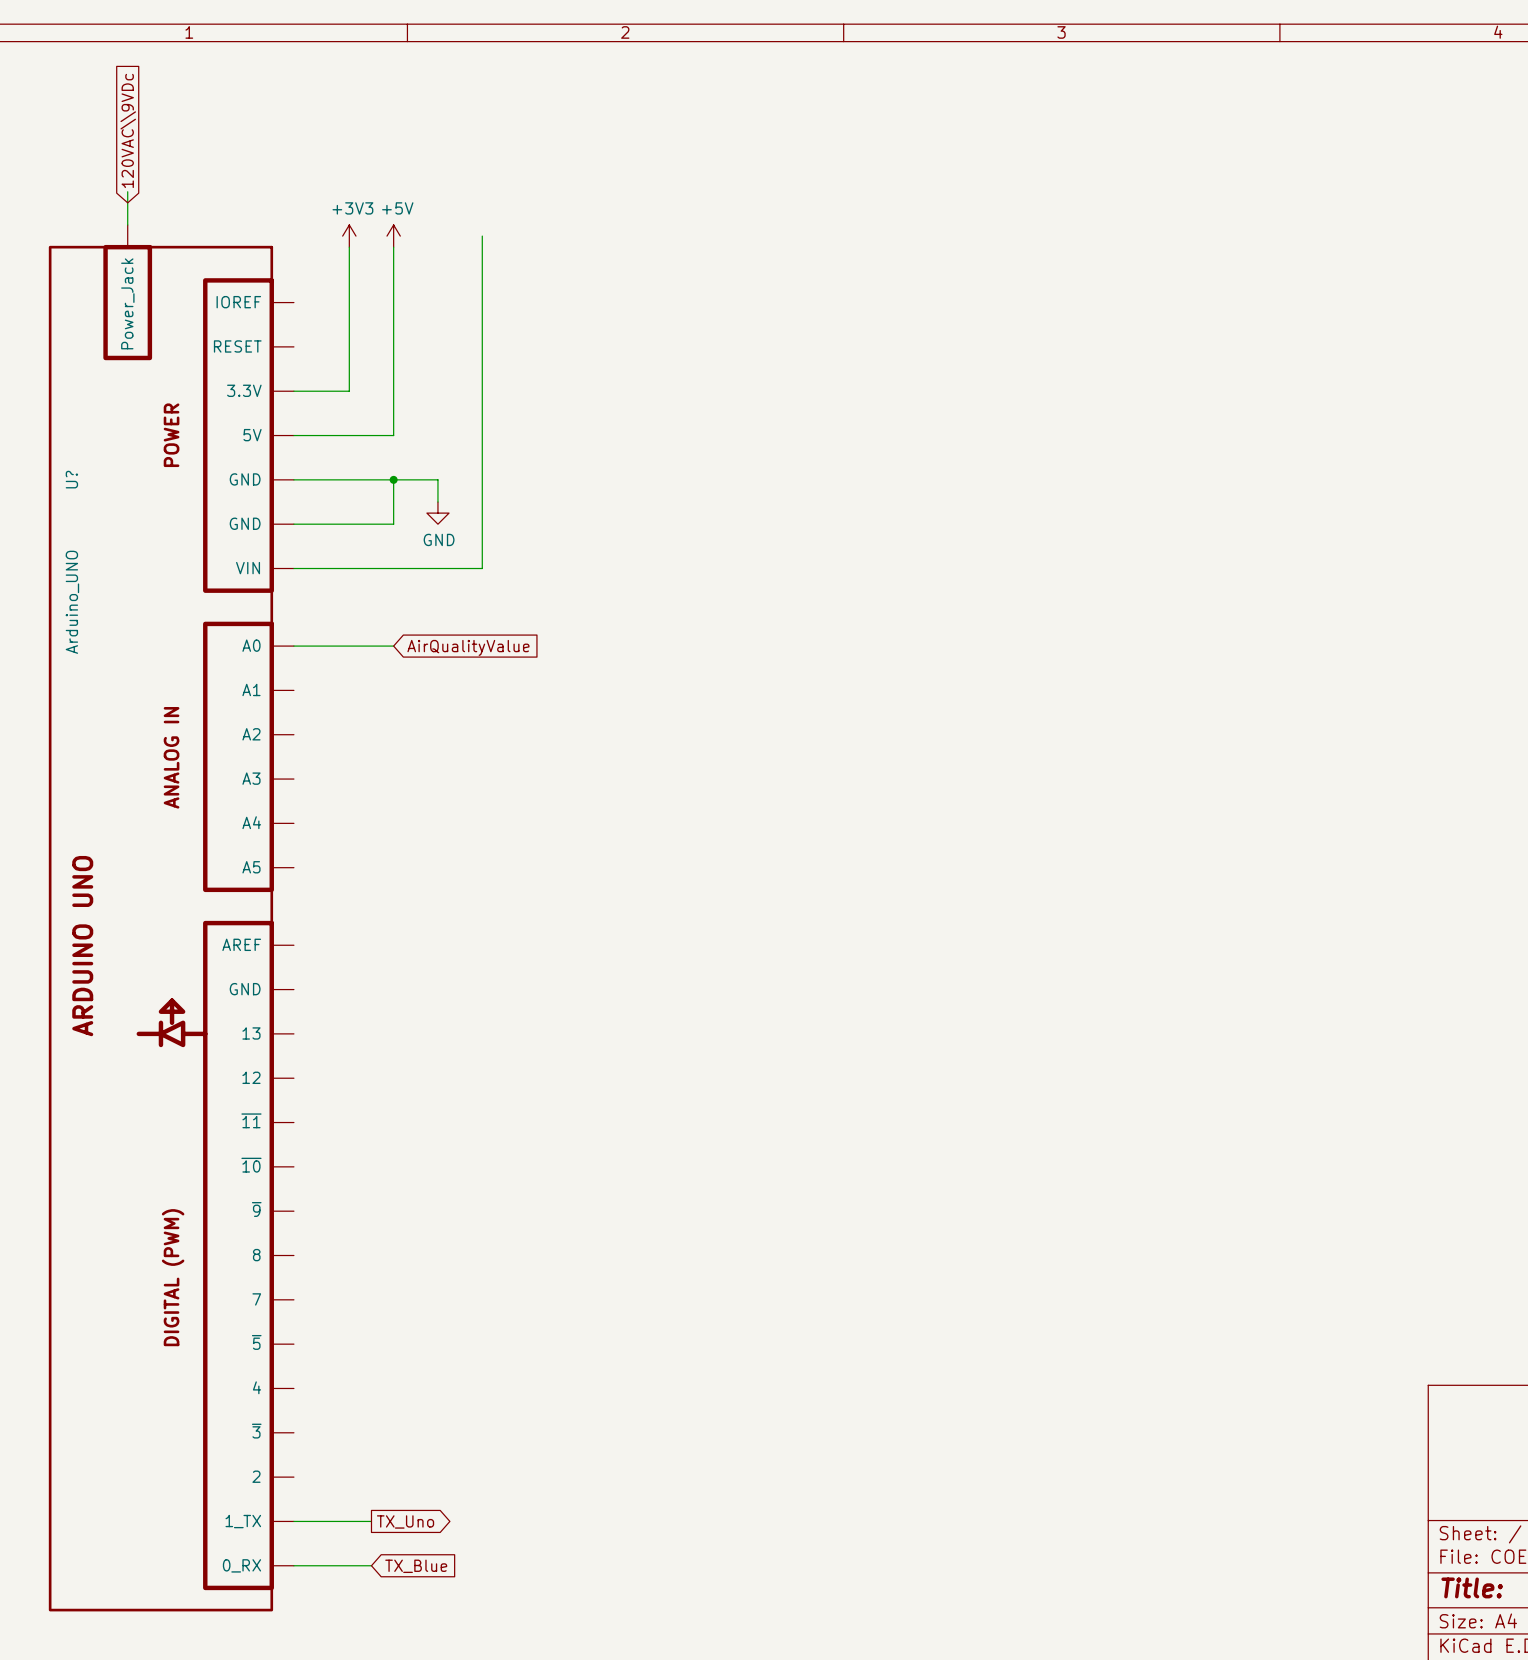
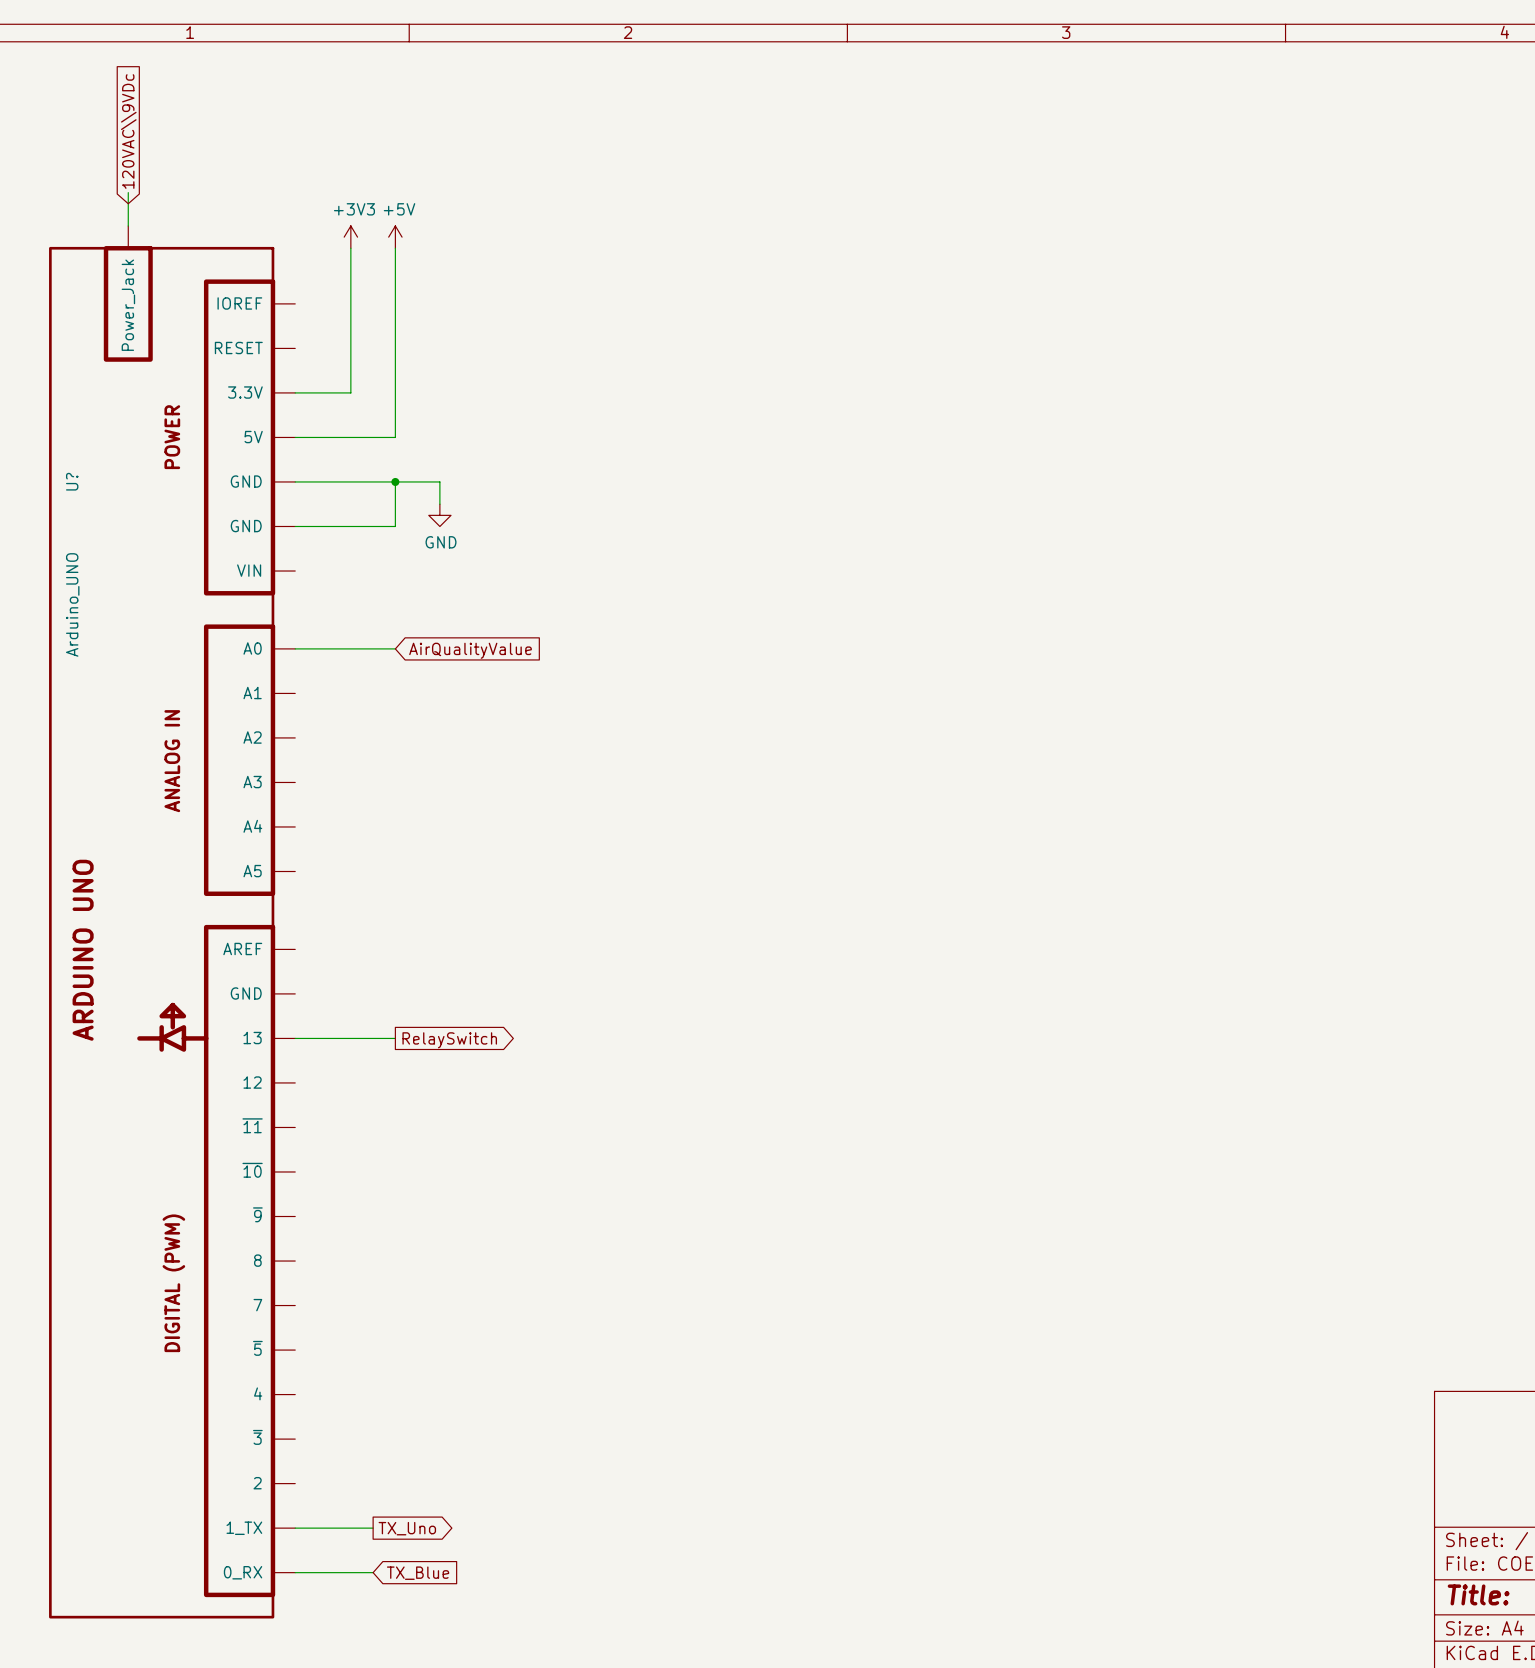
wire: (482, 236) (482, 568) (293, 568) -> none
wire: none -> (295, 1038) (395, 1038)
global label: none -> RelaySwitch (449, 1040)

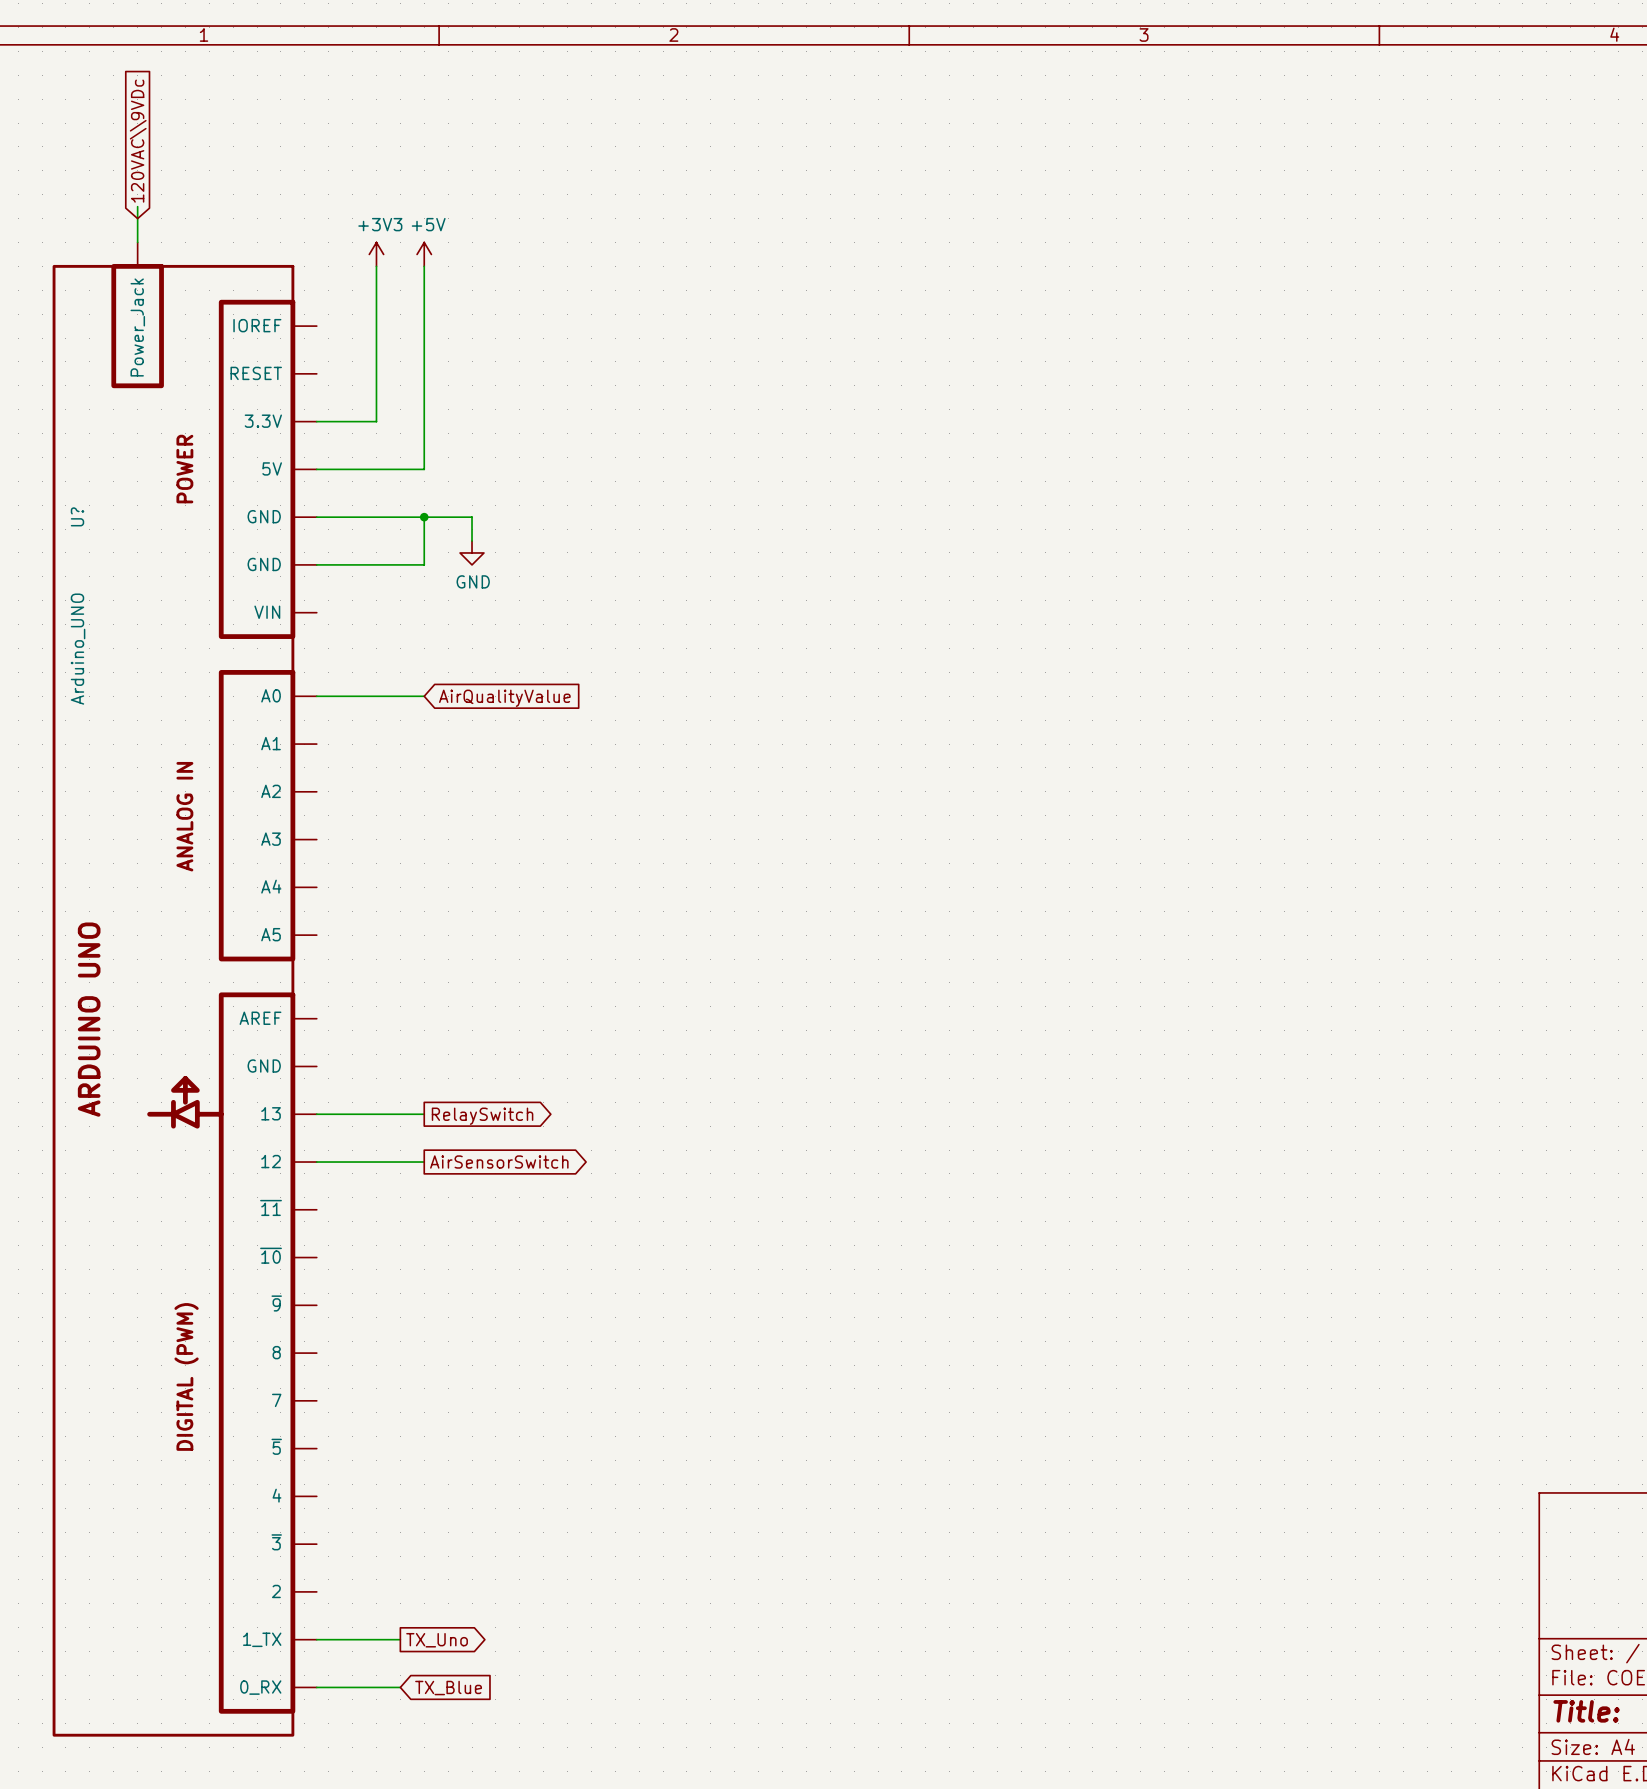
wire: none -> (316, 1162) (424, 1162)
global label: none -> AirSensorSwitch (499, 1162)

